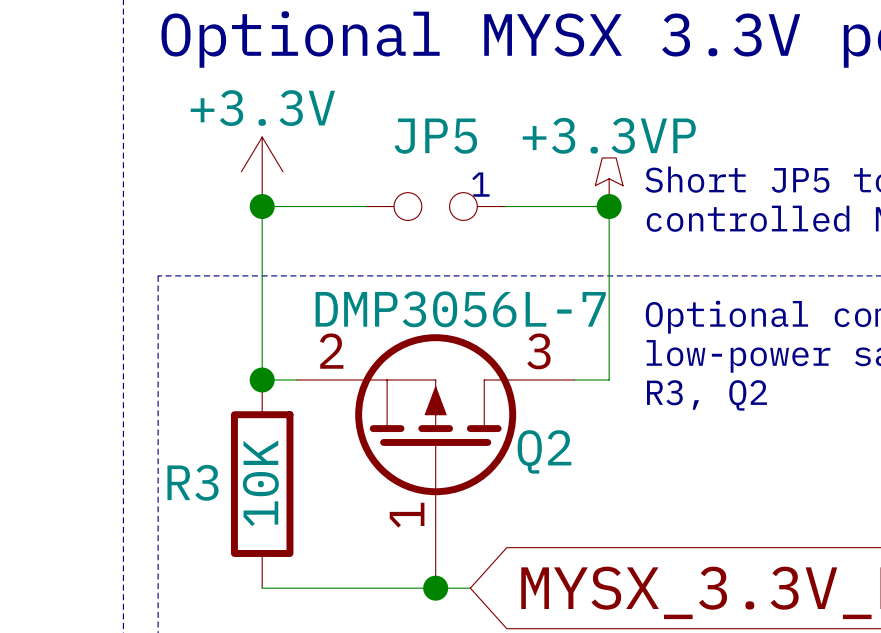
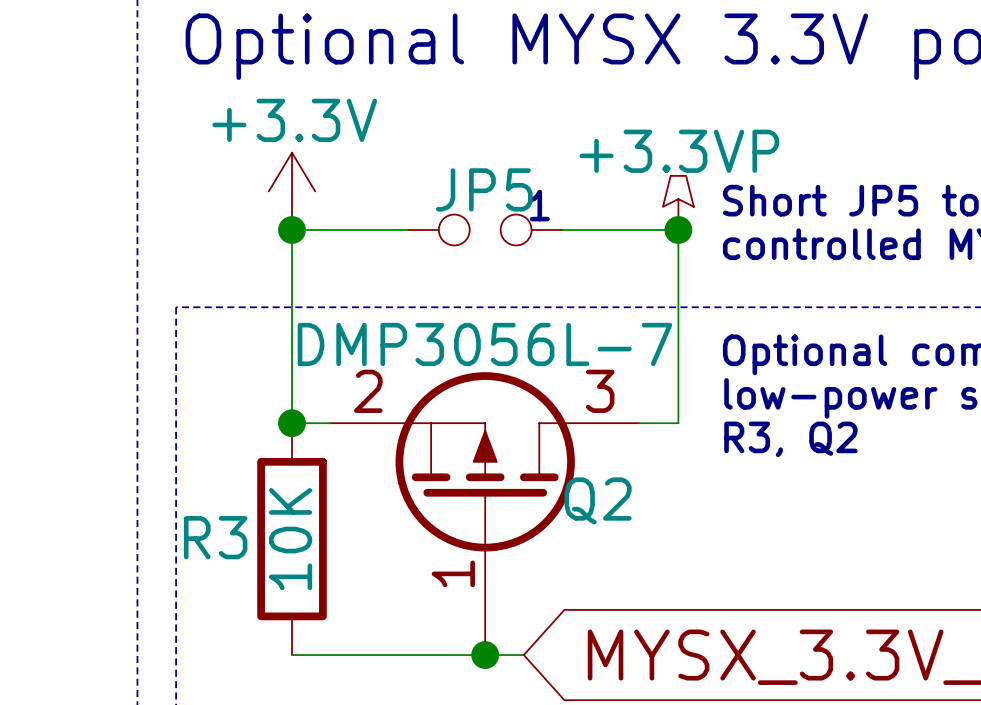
JP5 name position: JP5 (435, 136) -> JP5 (484, 189)

